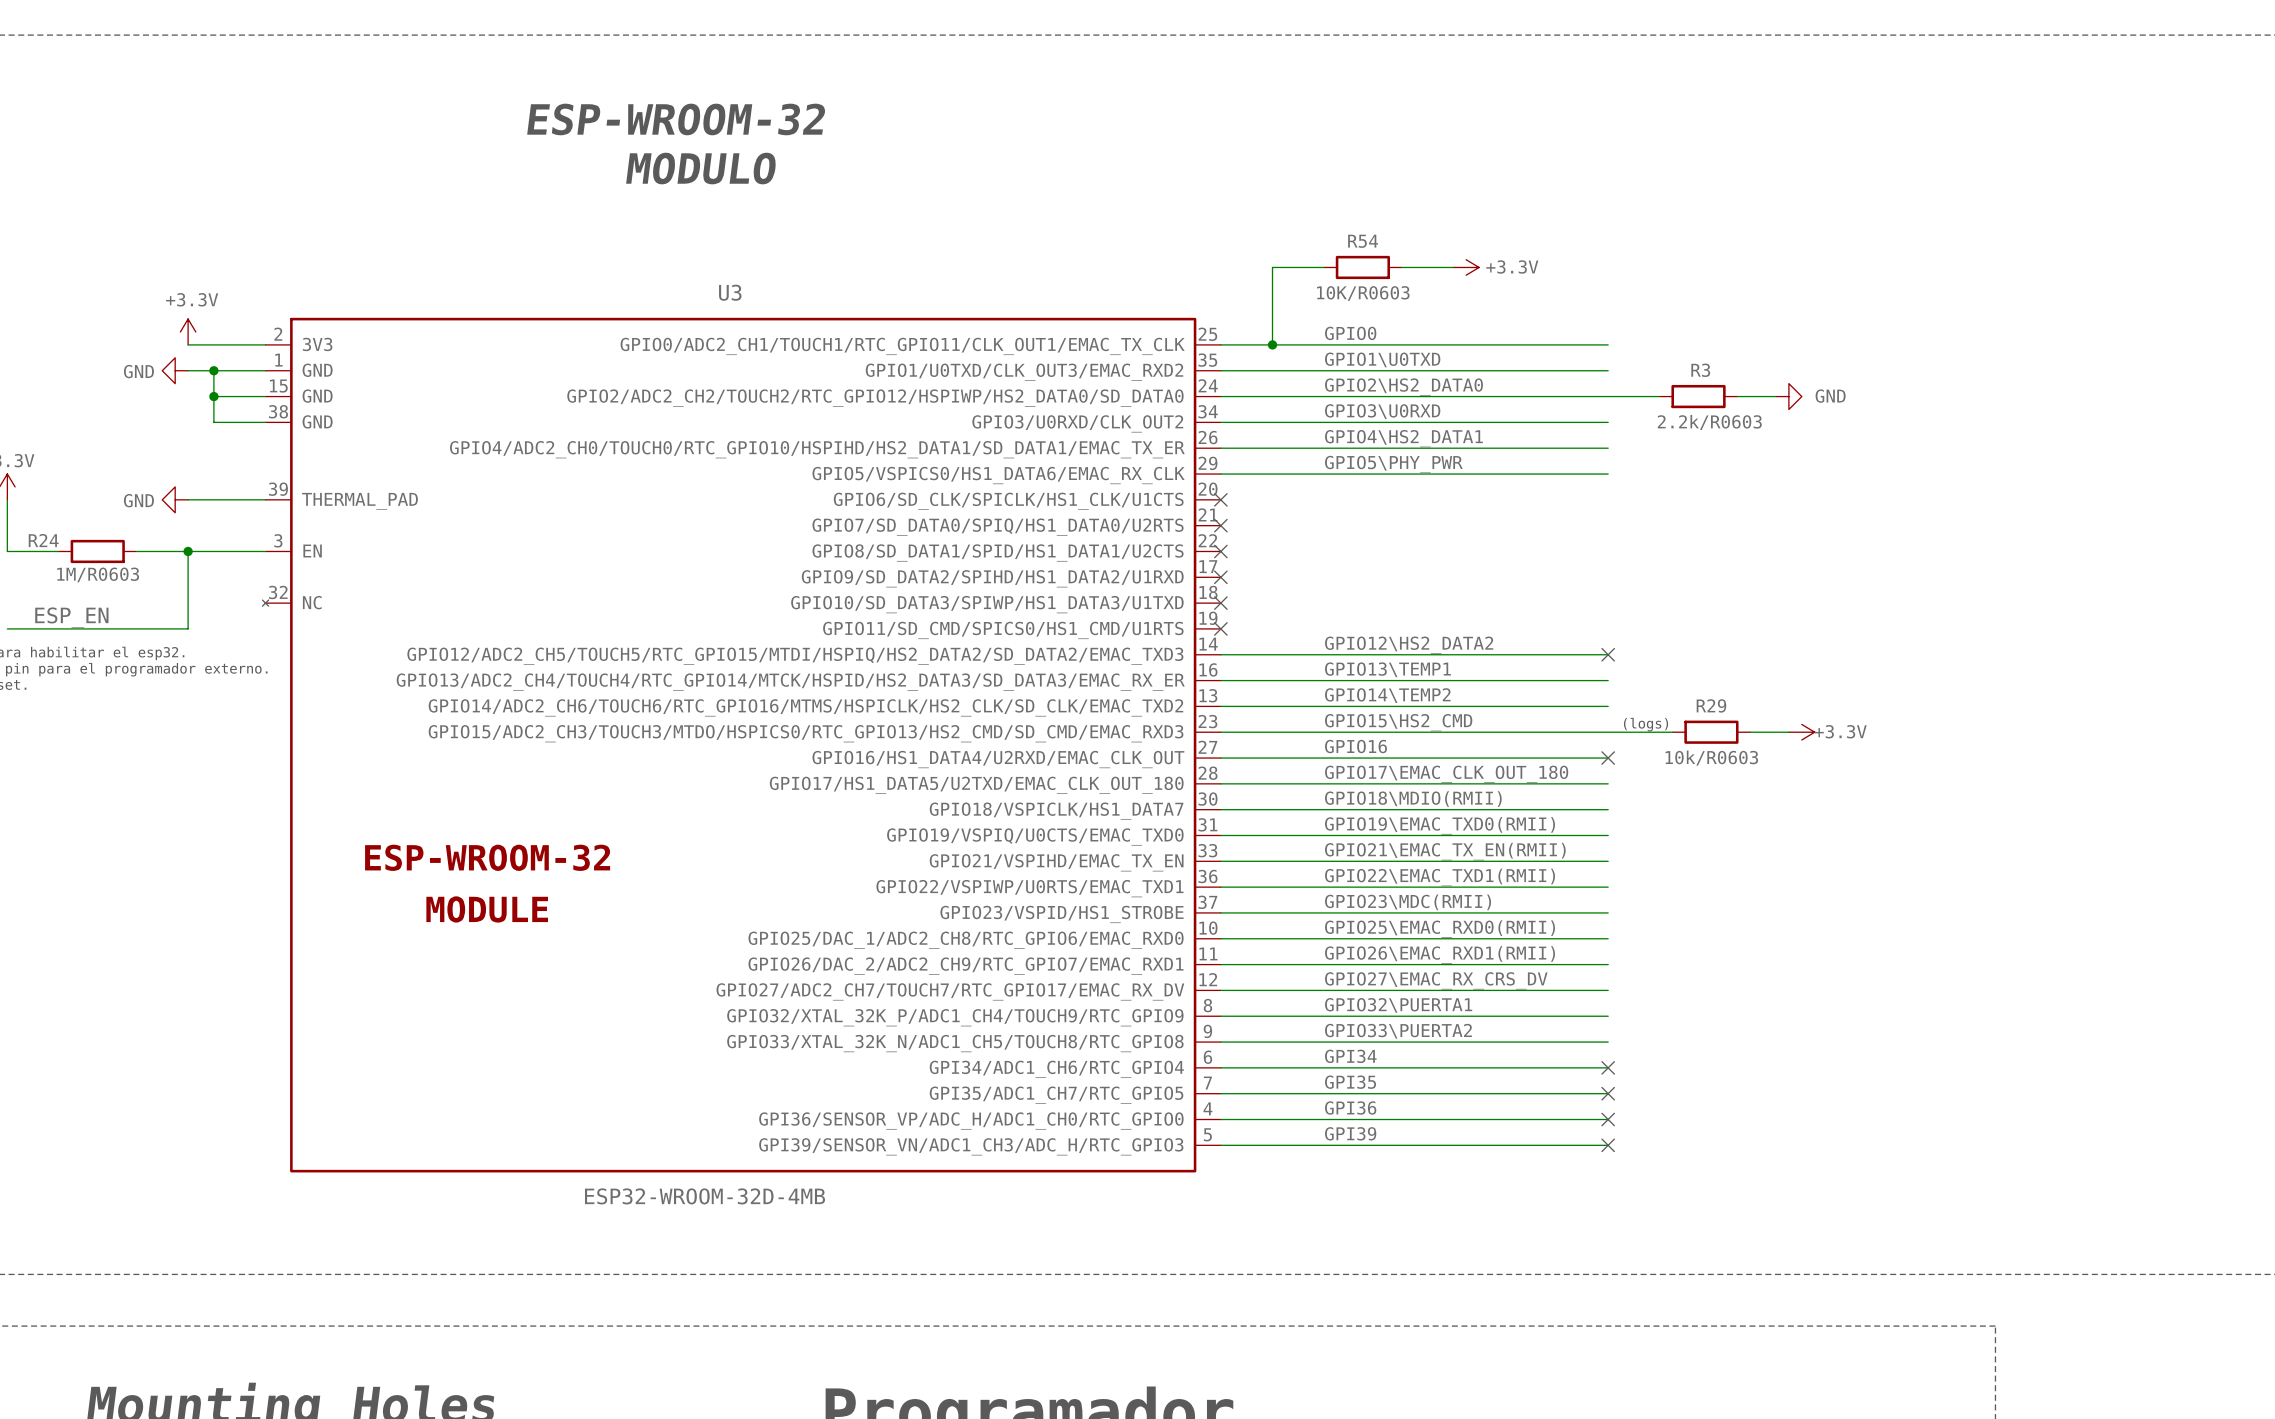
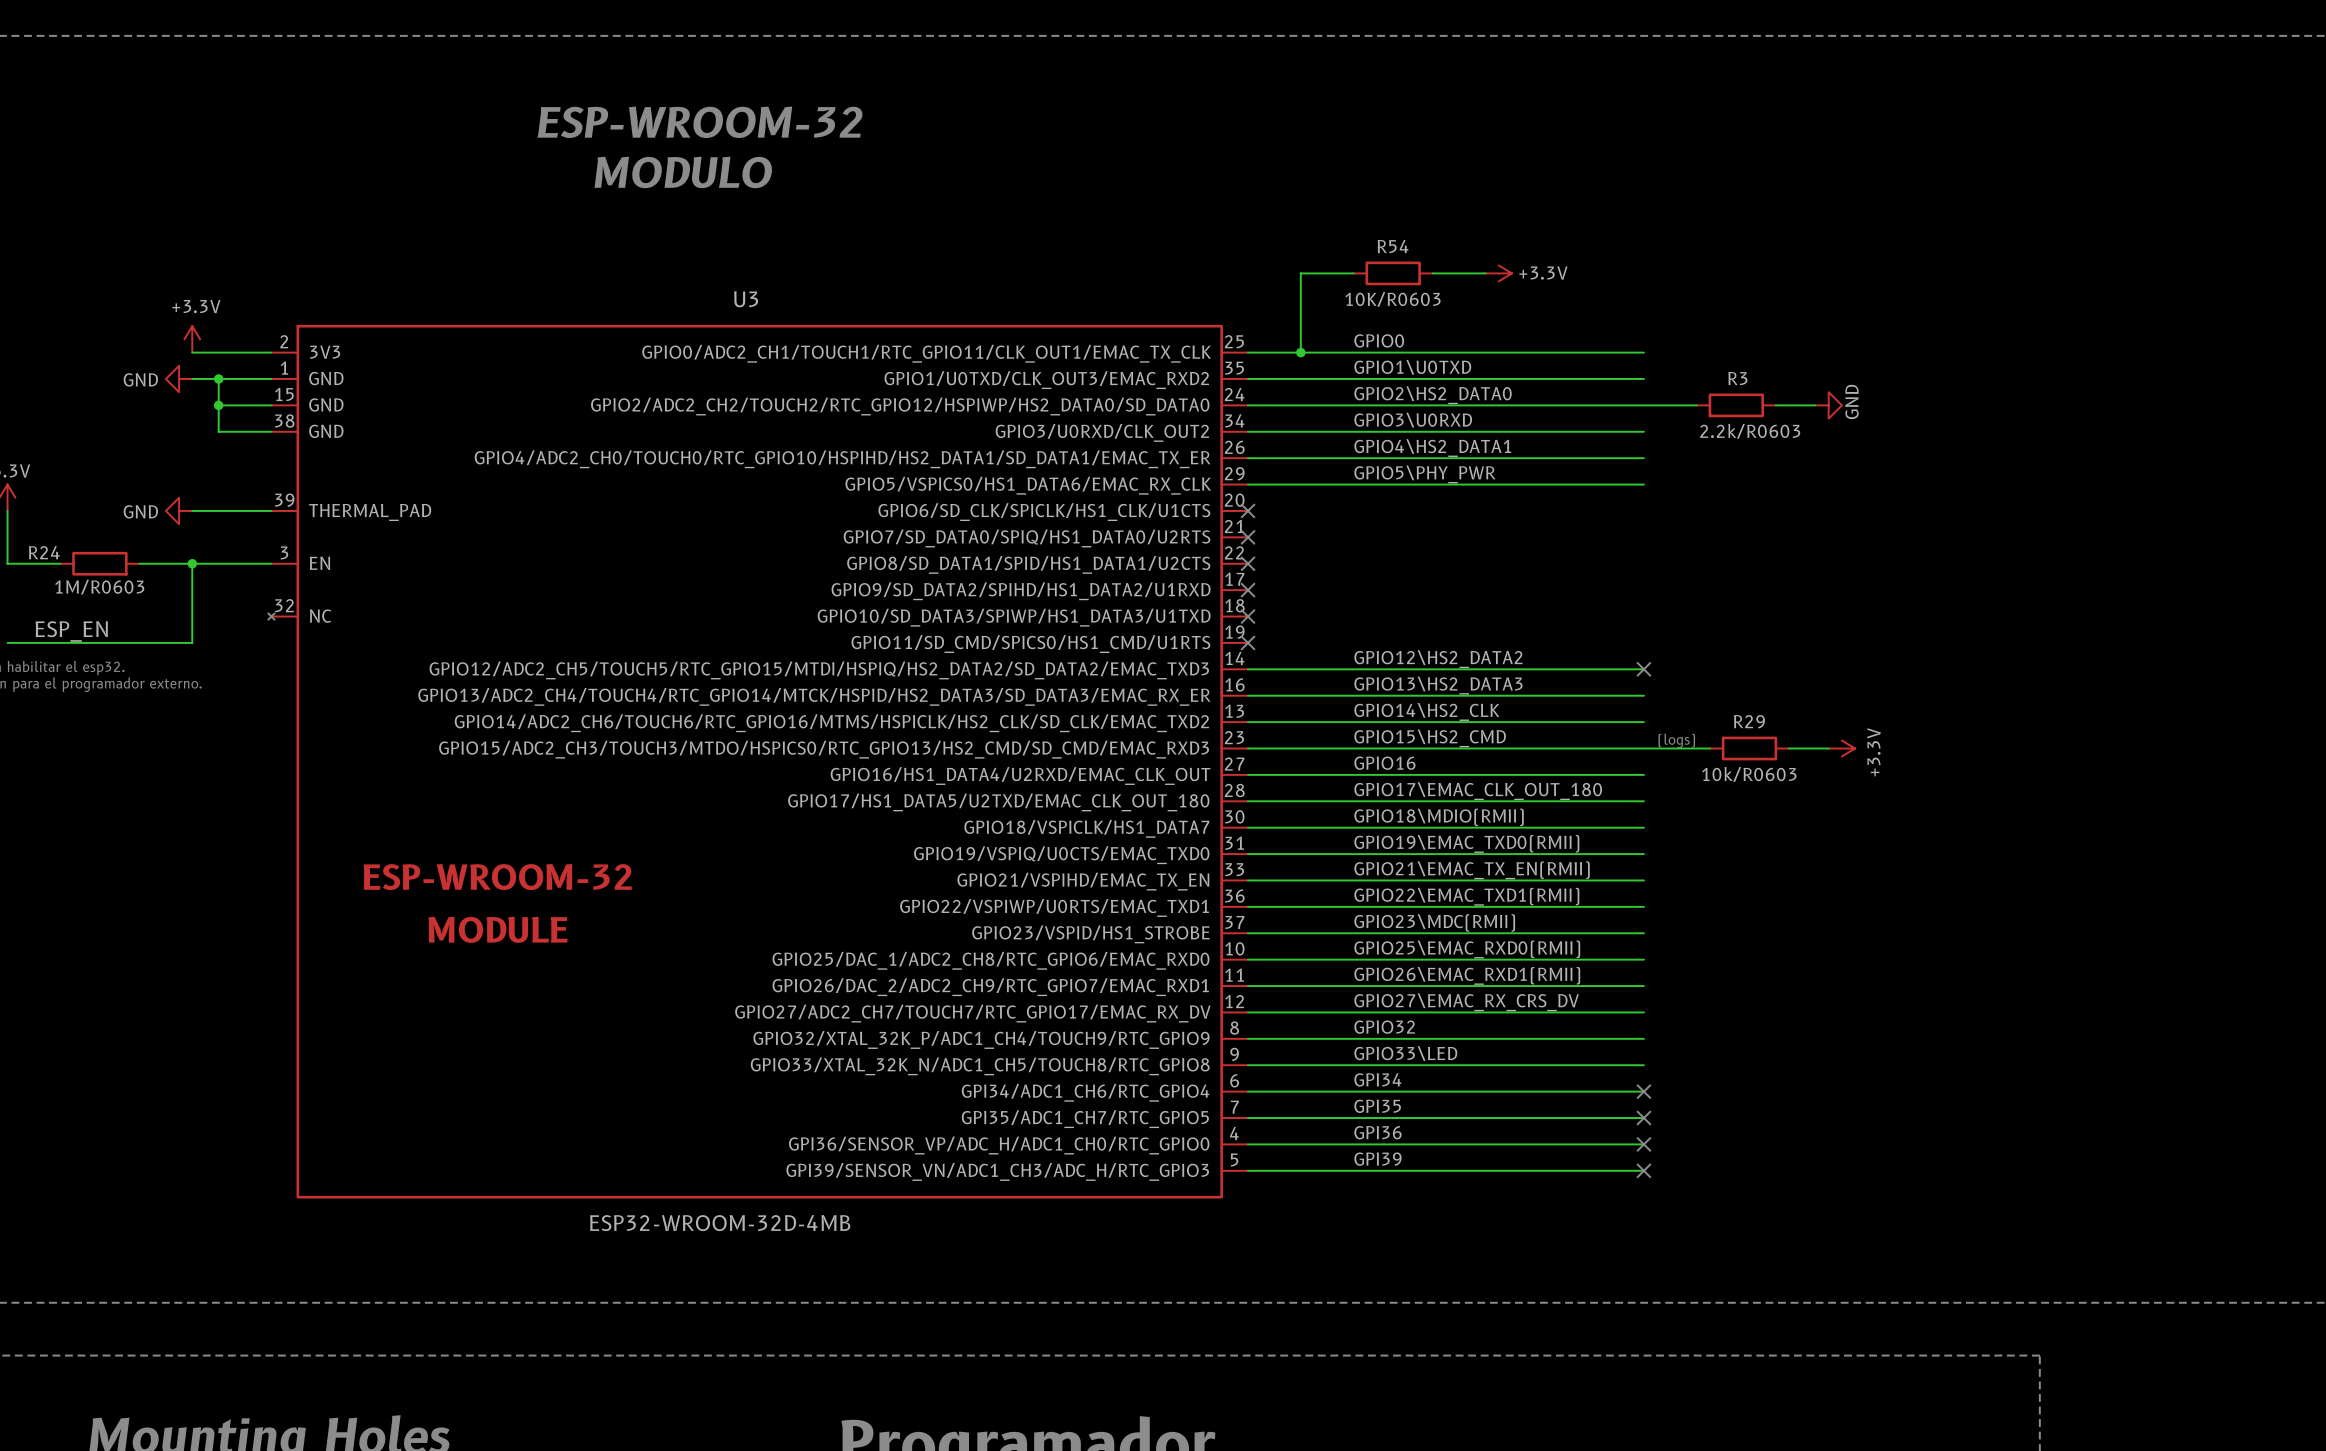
power symbol text rotation: 0° (1830, 396) -> 90° counterclockwise (1852, 401)
label: GPIO13\TEMP1 (1387, 669) -> GPIO13\HS2_DATA3 (1438, 685)
label: GPIO14\TEMP2 (1387, 695) -> GPIO14\HS2_CLK (1426, 711)
power symbol text rotation: 0° (1840, 731) -> 90° counterclockwise (1873, 752)
no-connect mark: (1608, 758) -> none
label: GPIO32\PUERTA1 (1398, 1005) -> GPIO32 (1384, 1027)
label: GPIO33\PUERTA2 (1398, 1031) -> GPIO33\LED (1405, 1053)

